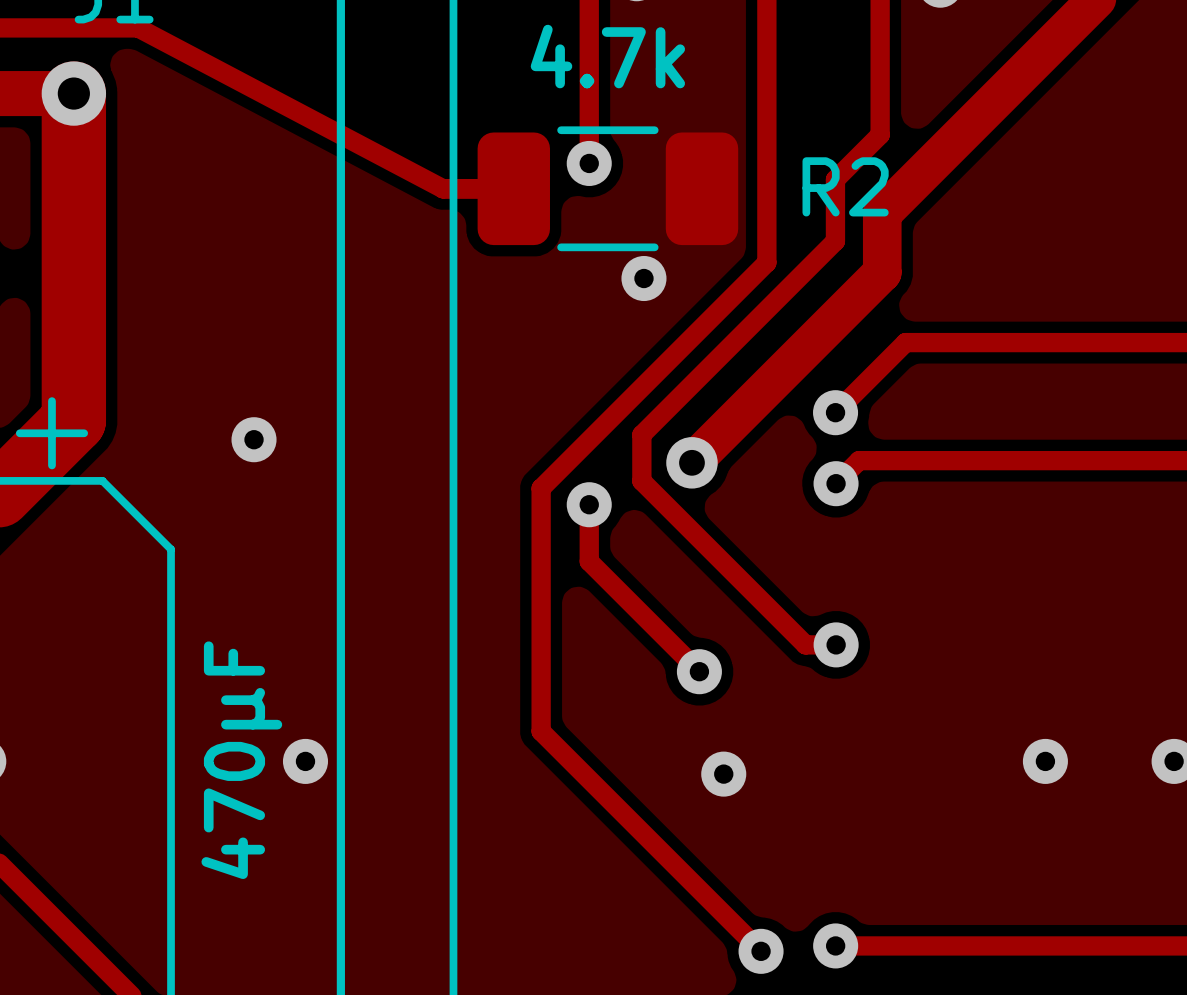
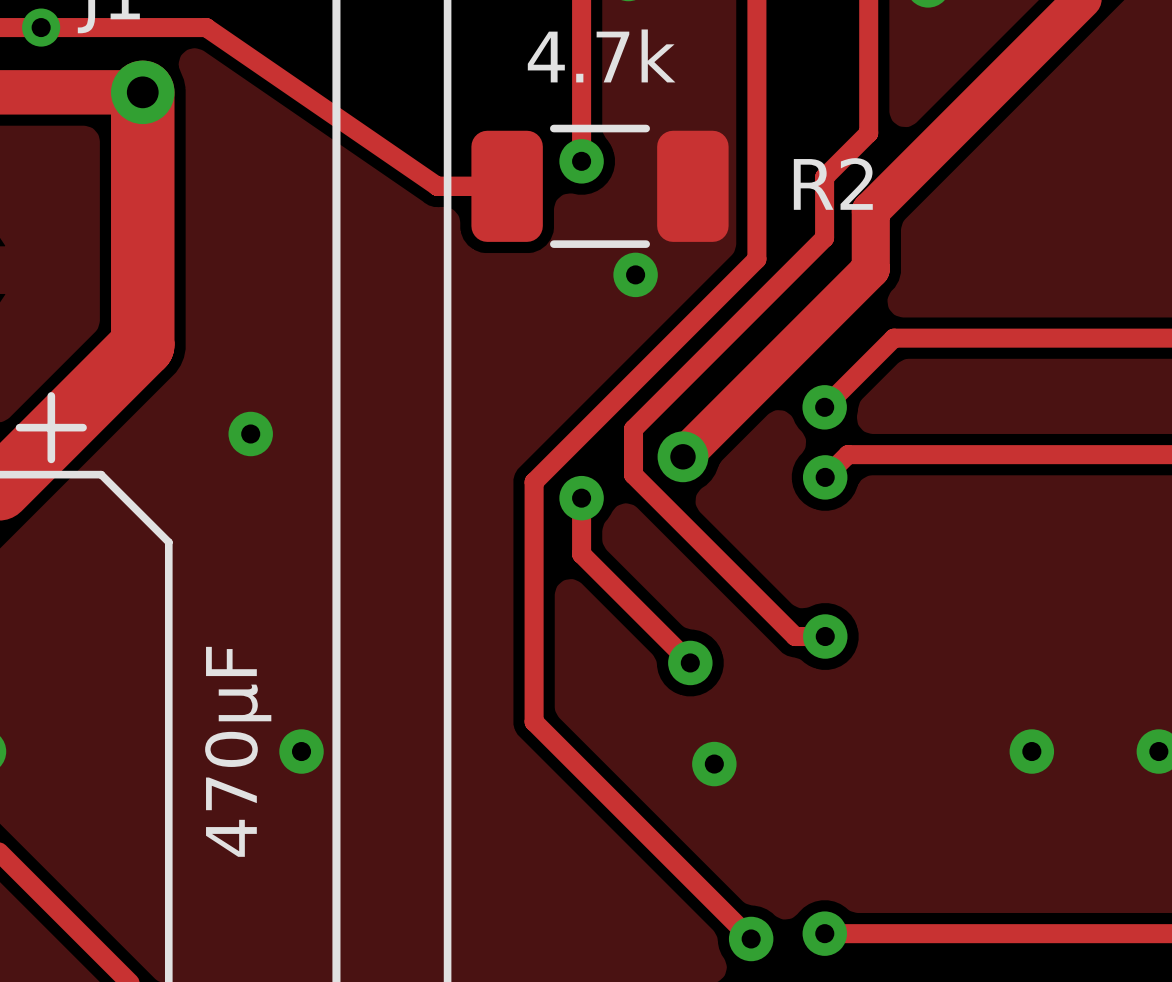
via: none -> (41, 27)
track: (138, 27) (443, 188) -> (136, 27) (206, 27) (437, 186)
track: (73, 93) (73, 420) -> (72, 92) (142, 92) (142, 345) (72, 414)
via position: (73, 93) -> (142, 92)

